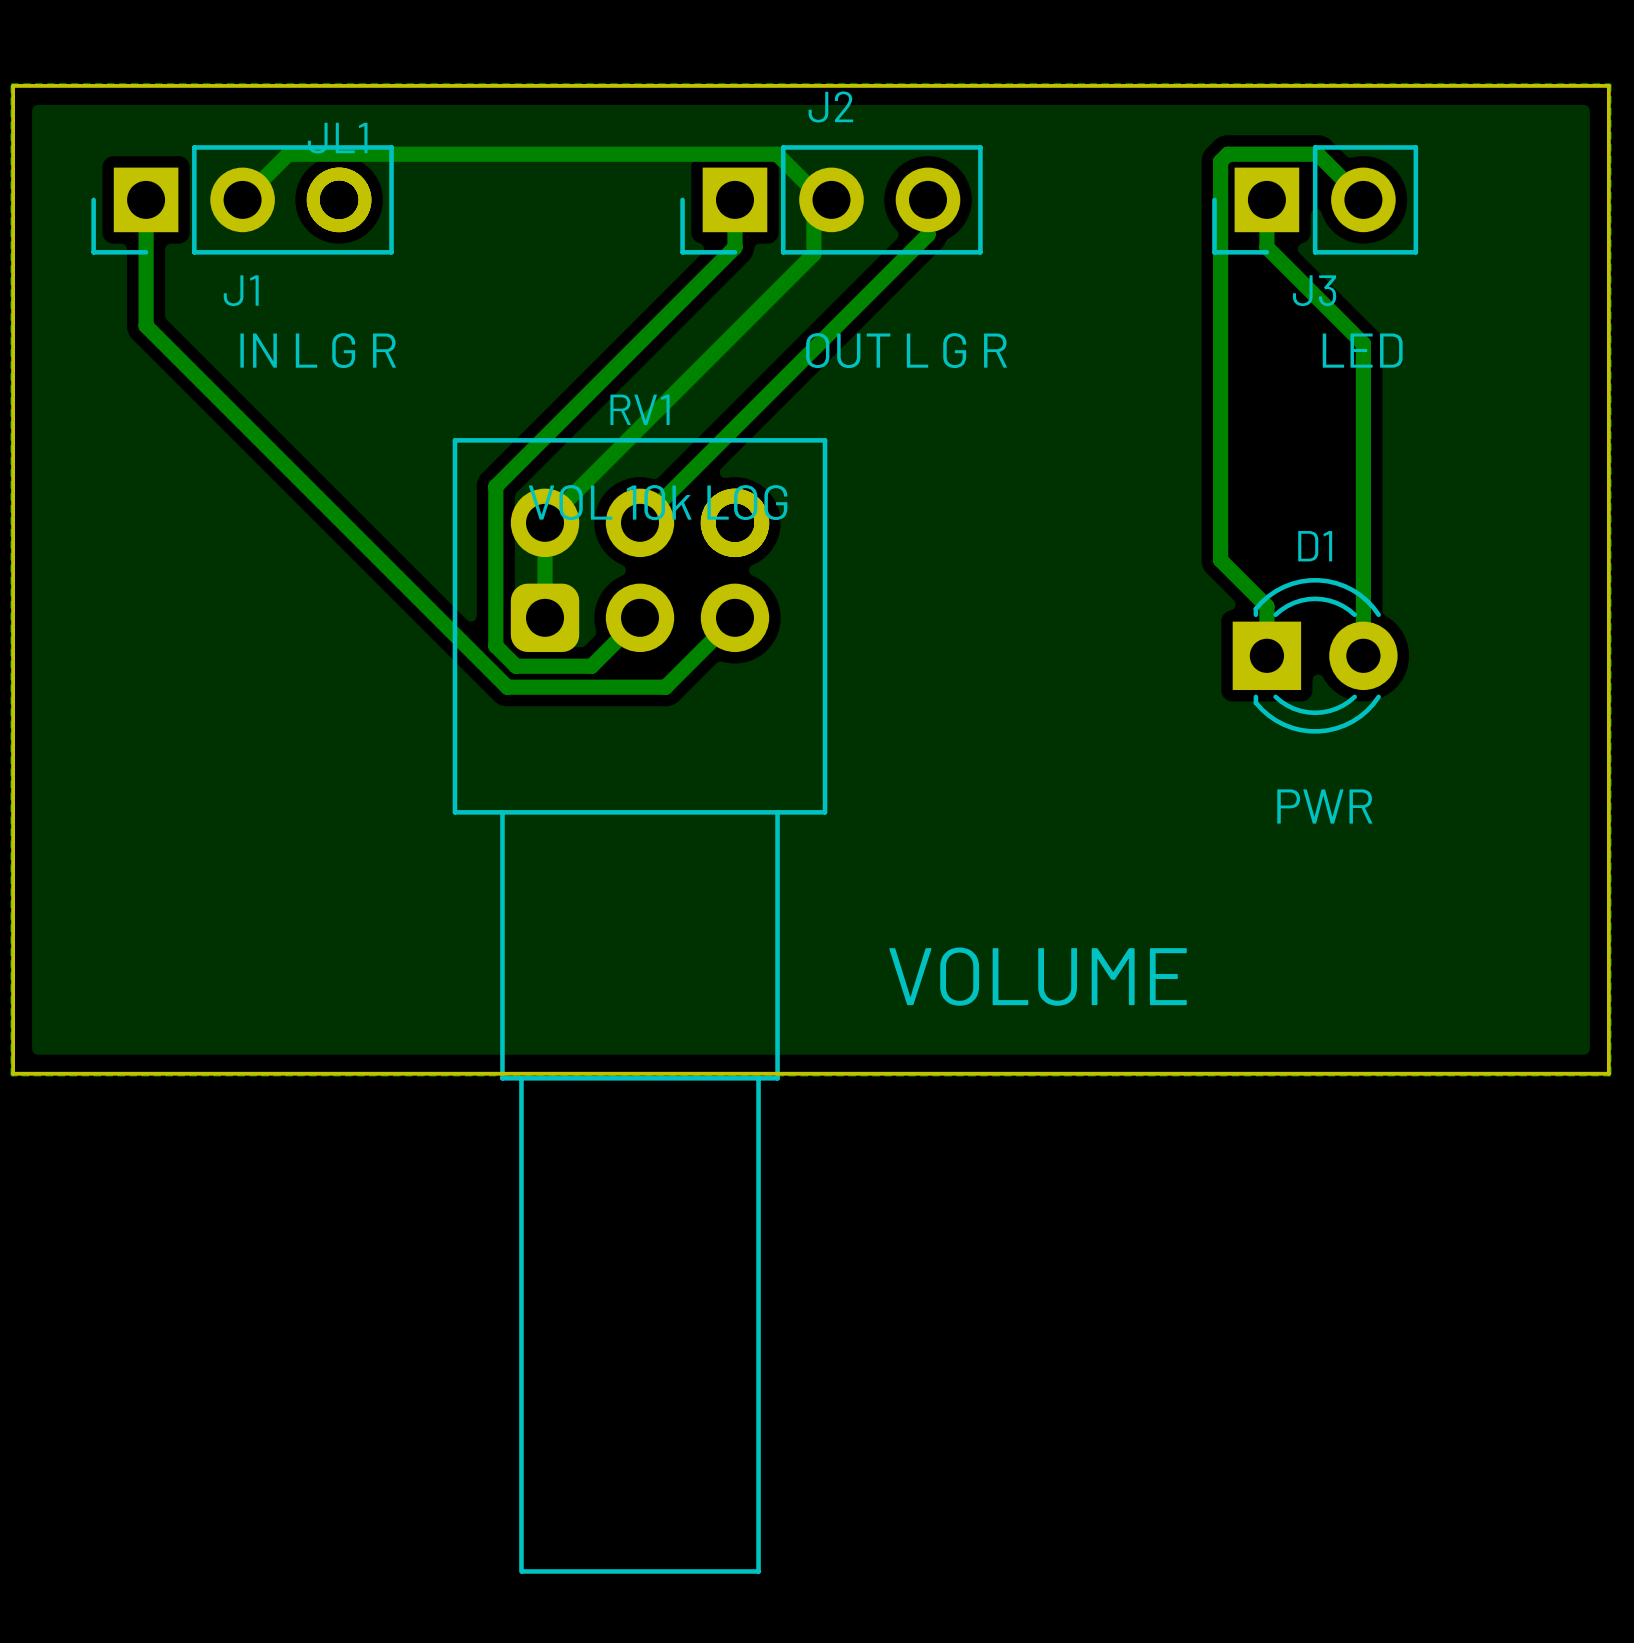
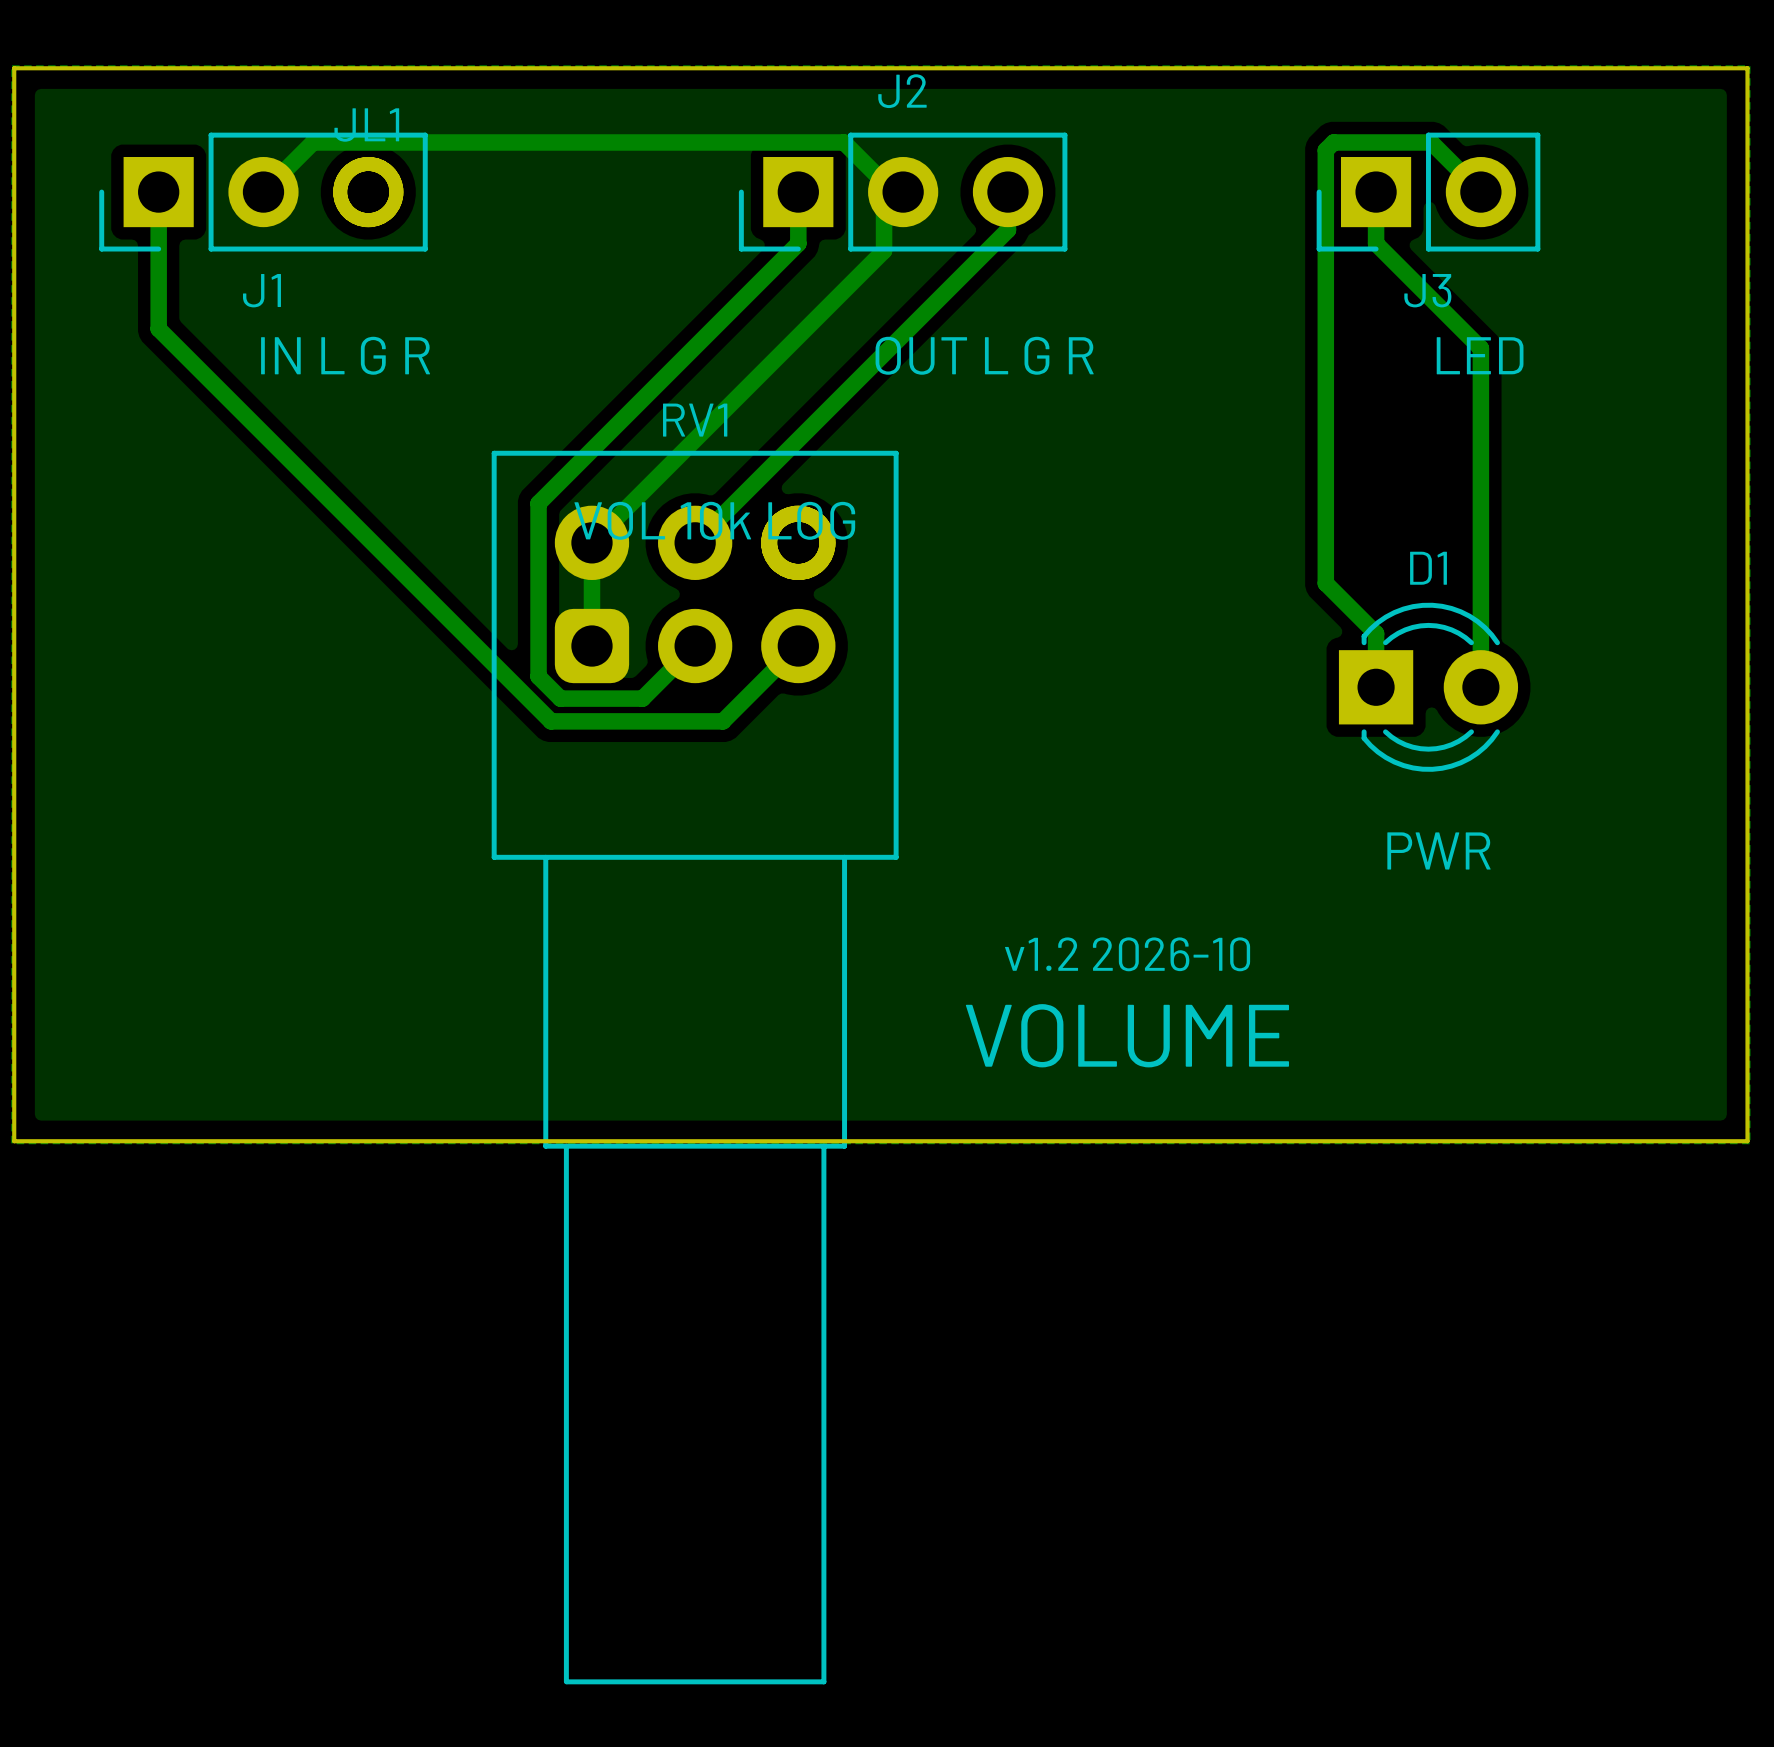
text: none -> v1.2 2026-10 (1127, 954)

